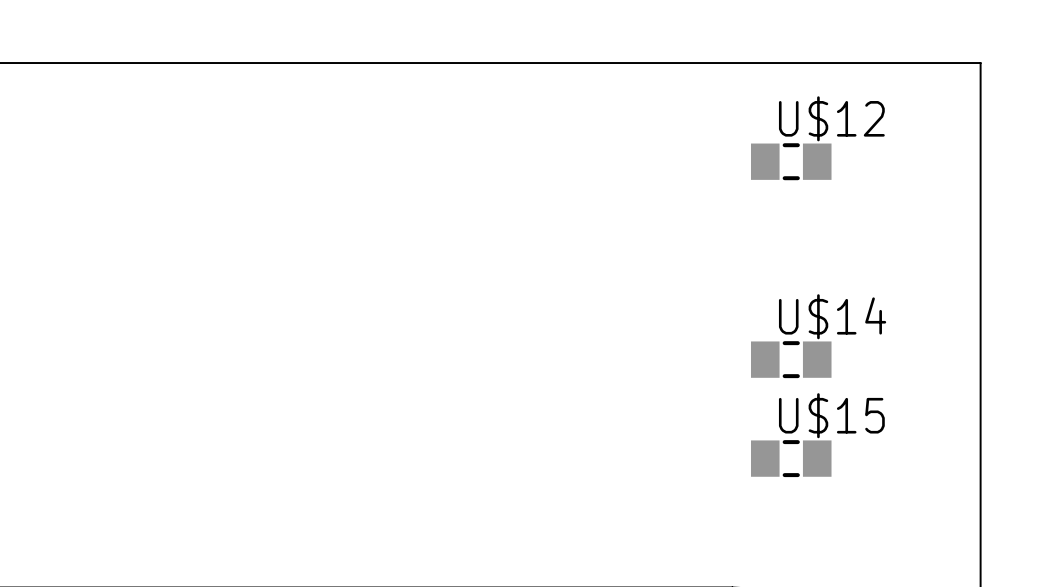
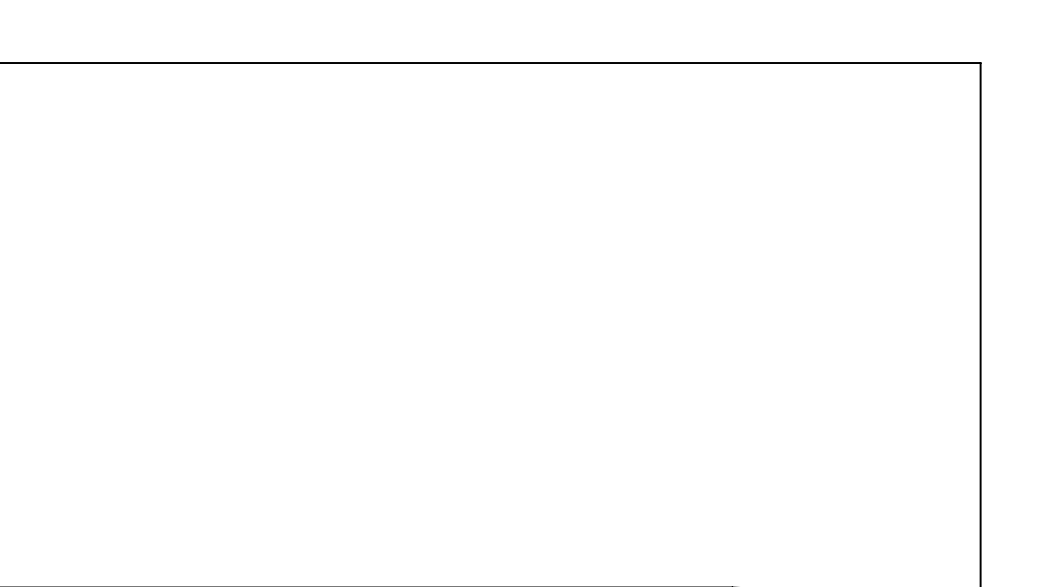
U$12: (791, 161) -> none
U$14: (791, 359) -> none
U$15: (791, 458) -> none

